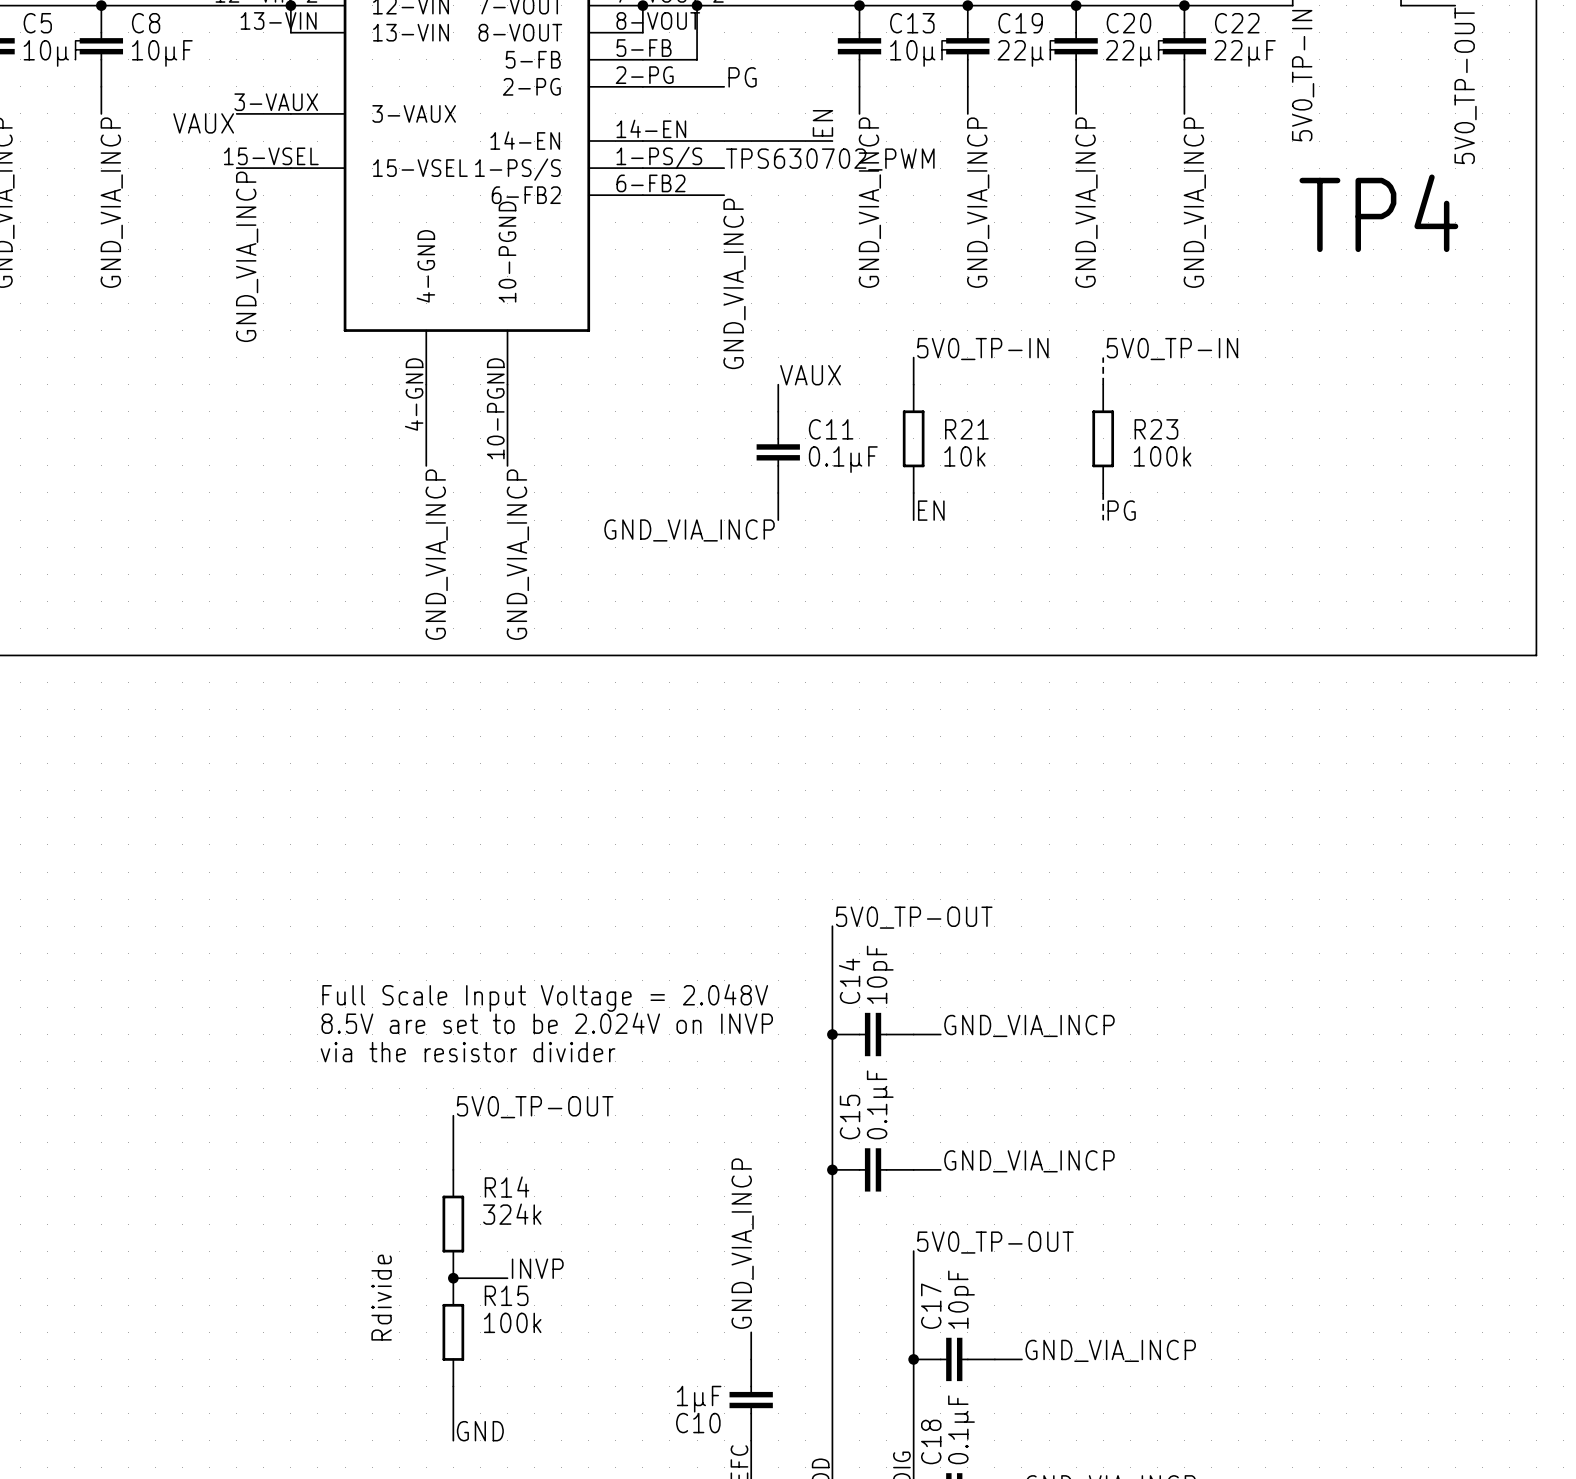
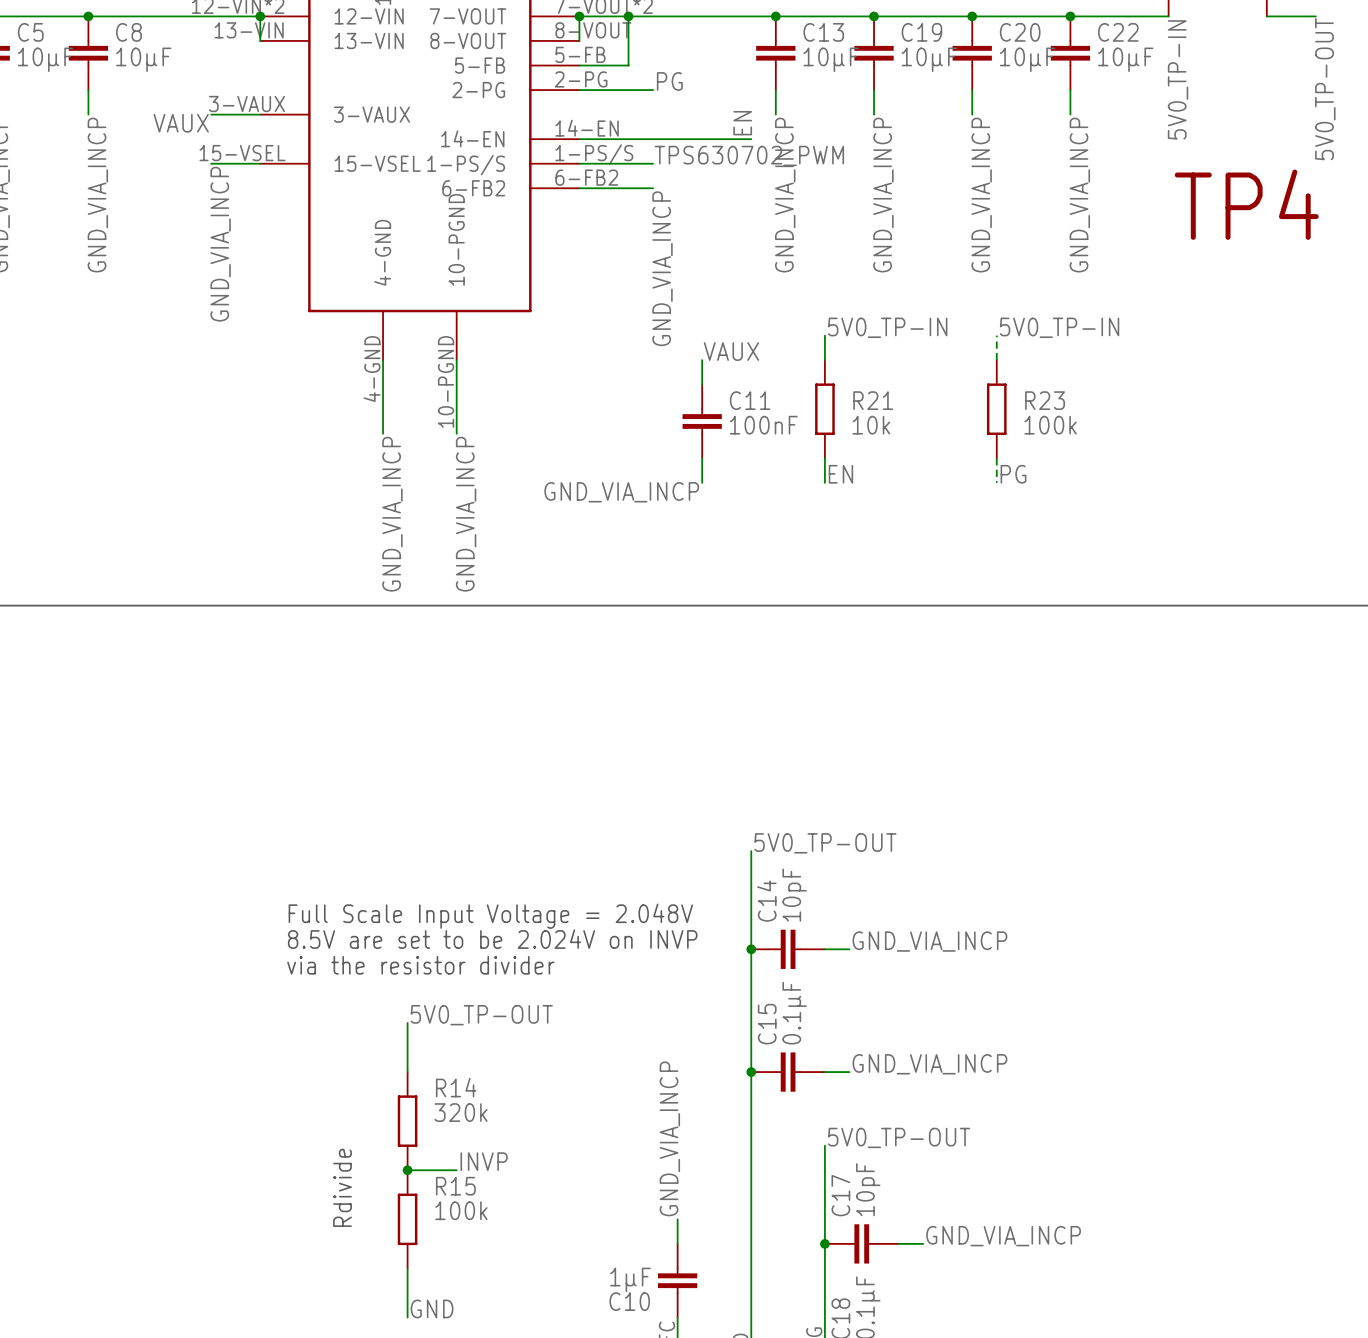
C19 value: 22μF (1028, 53) -> 10μF (929, 59)
C20 value: 22μF (1136, 53) -> 10μF (1027, 59)
C22 value: 22μF (1244, 53) -> 10μF (1125, 59)
C11 value: 0.1μF (843, 459) -> 100nF (763, 425)
R14 value: 324k (512, 1214) -> 320k (461, 1112)

